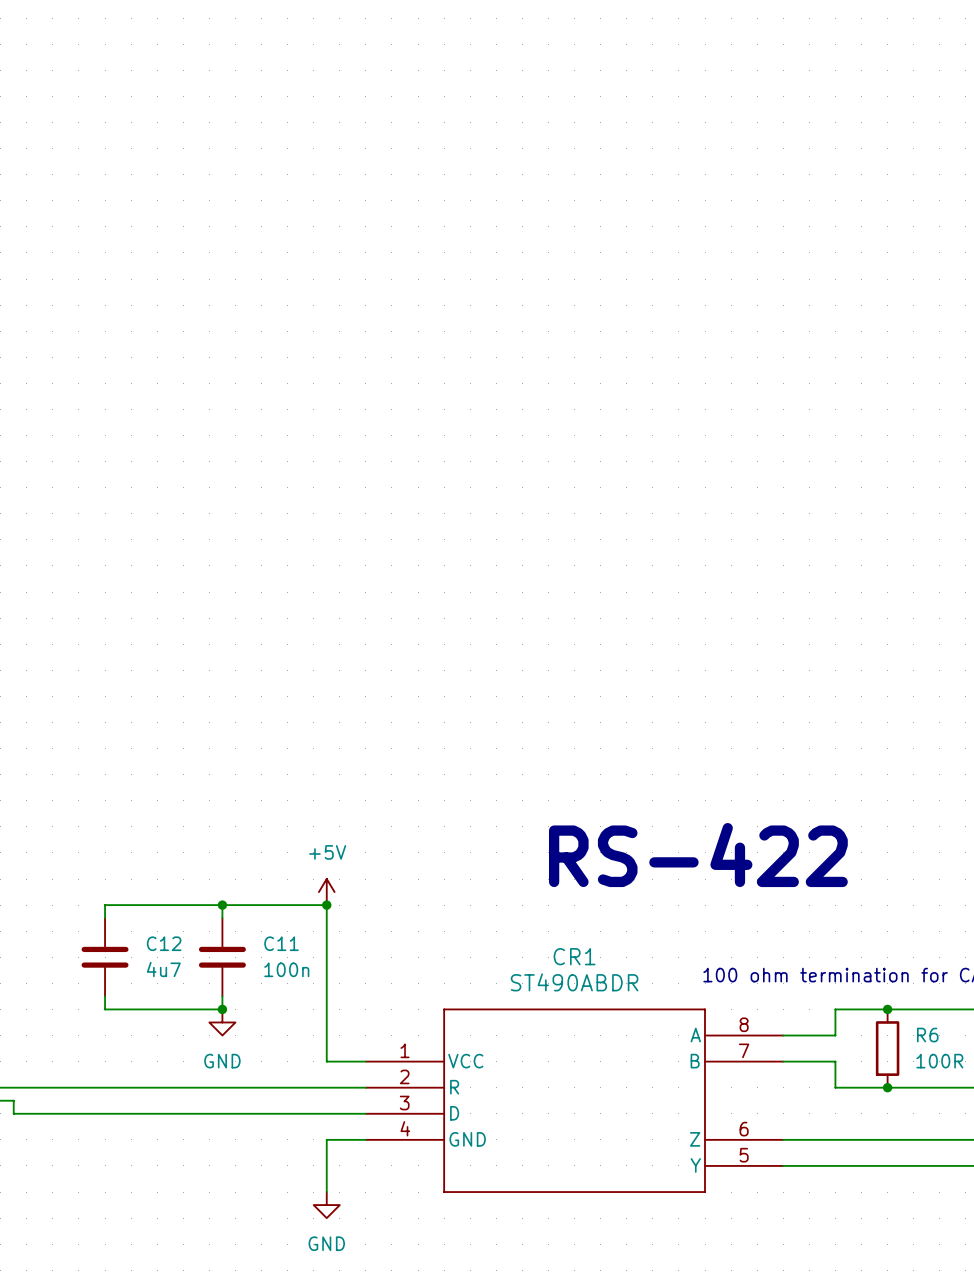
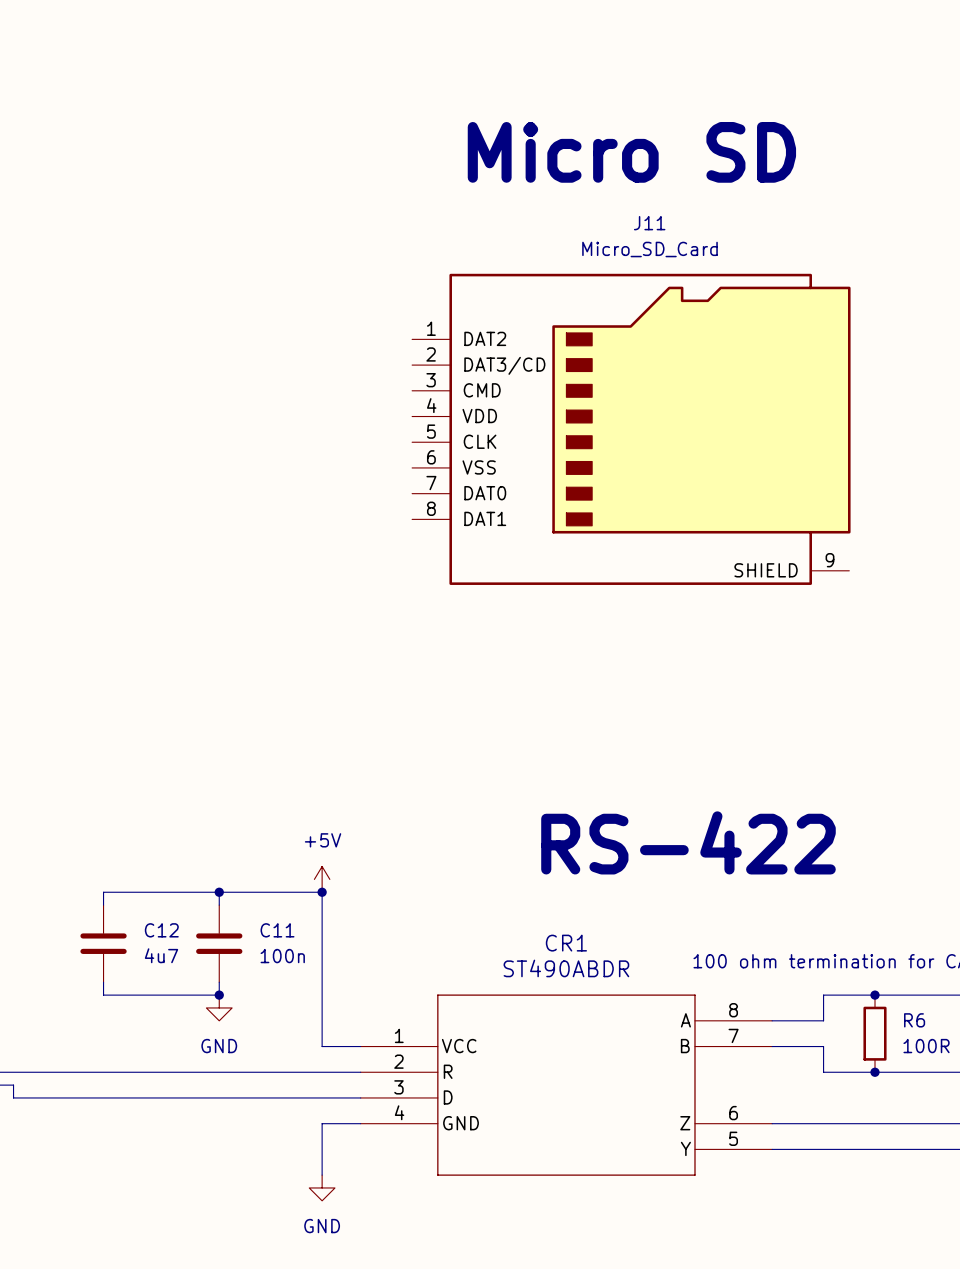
text: none -> Micro SD (631, 152)
J11: none -> Micro_SD_Card (631, 429)

